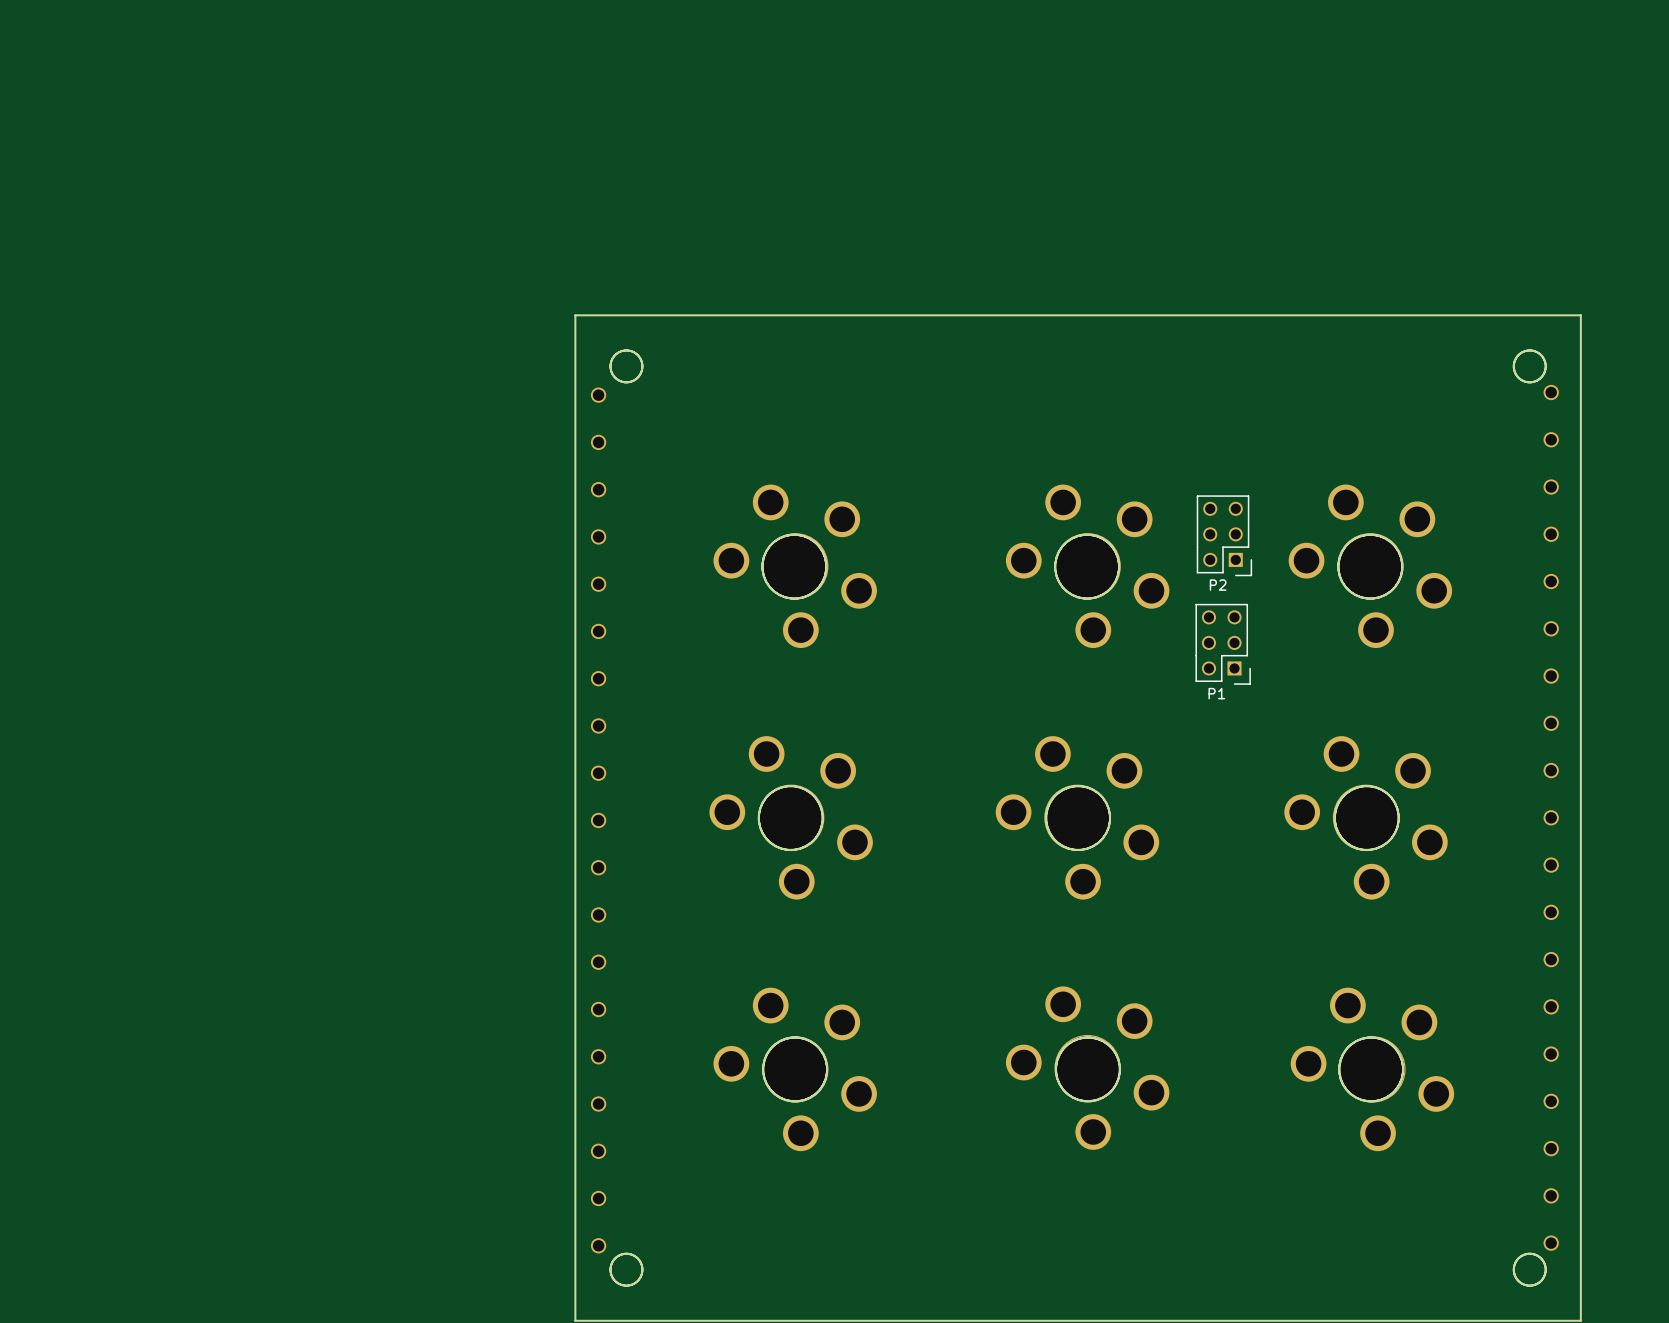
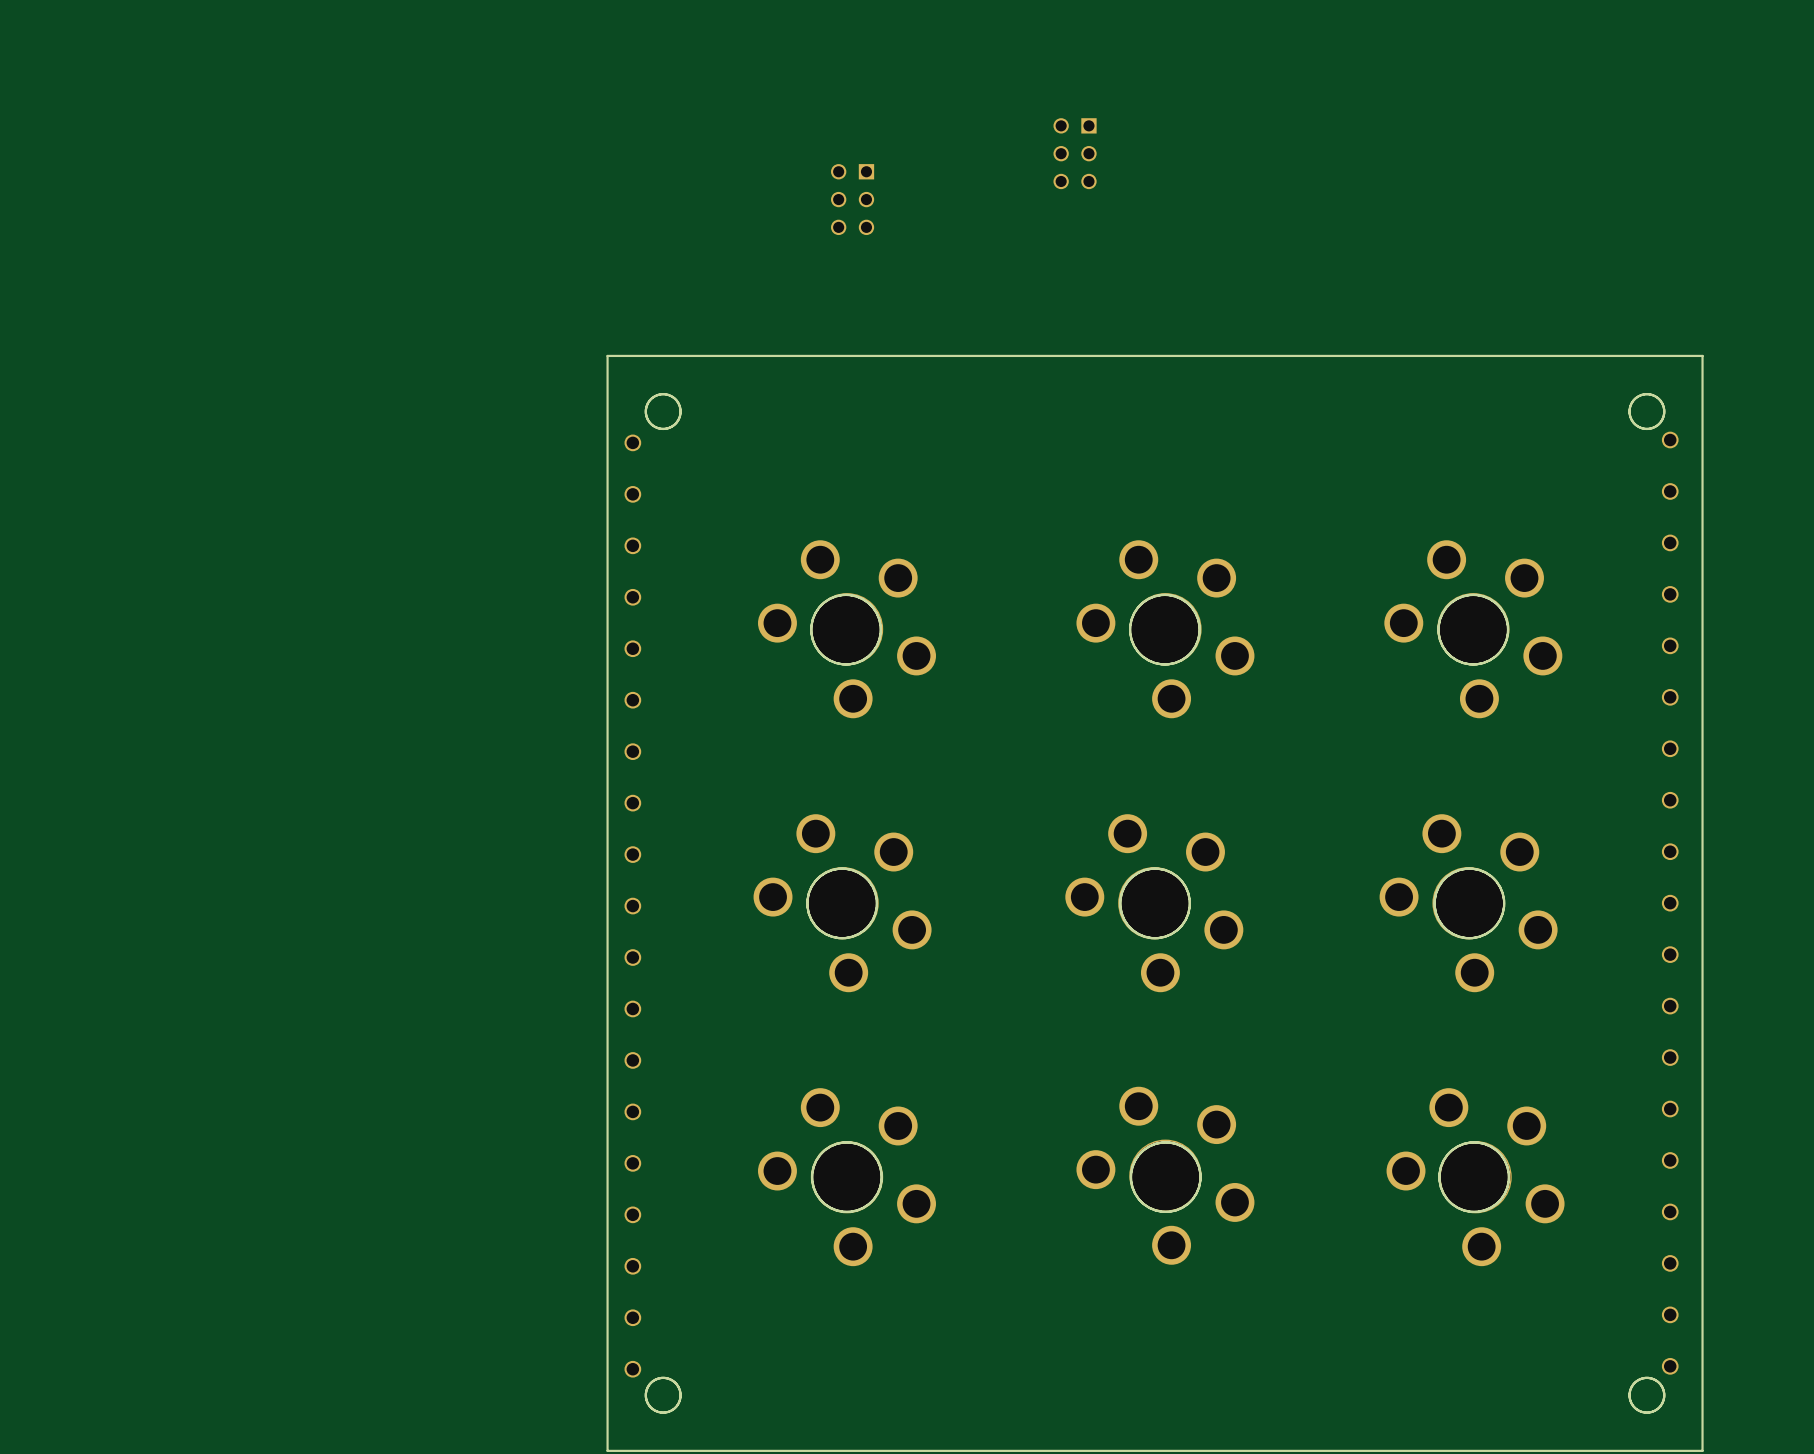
part: none -> (1075, 153)
part: none -> (852, 199)
P2: (1224, 535) -> none
P1: (1223, 644) -> none

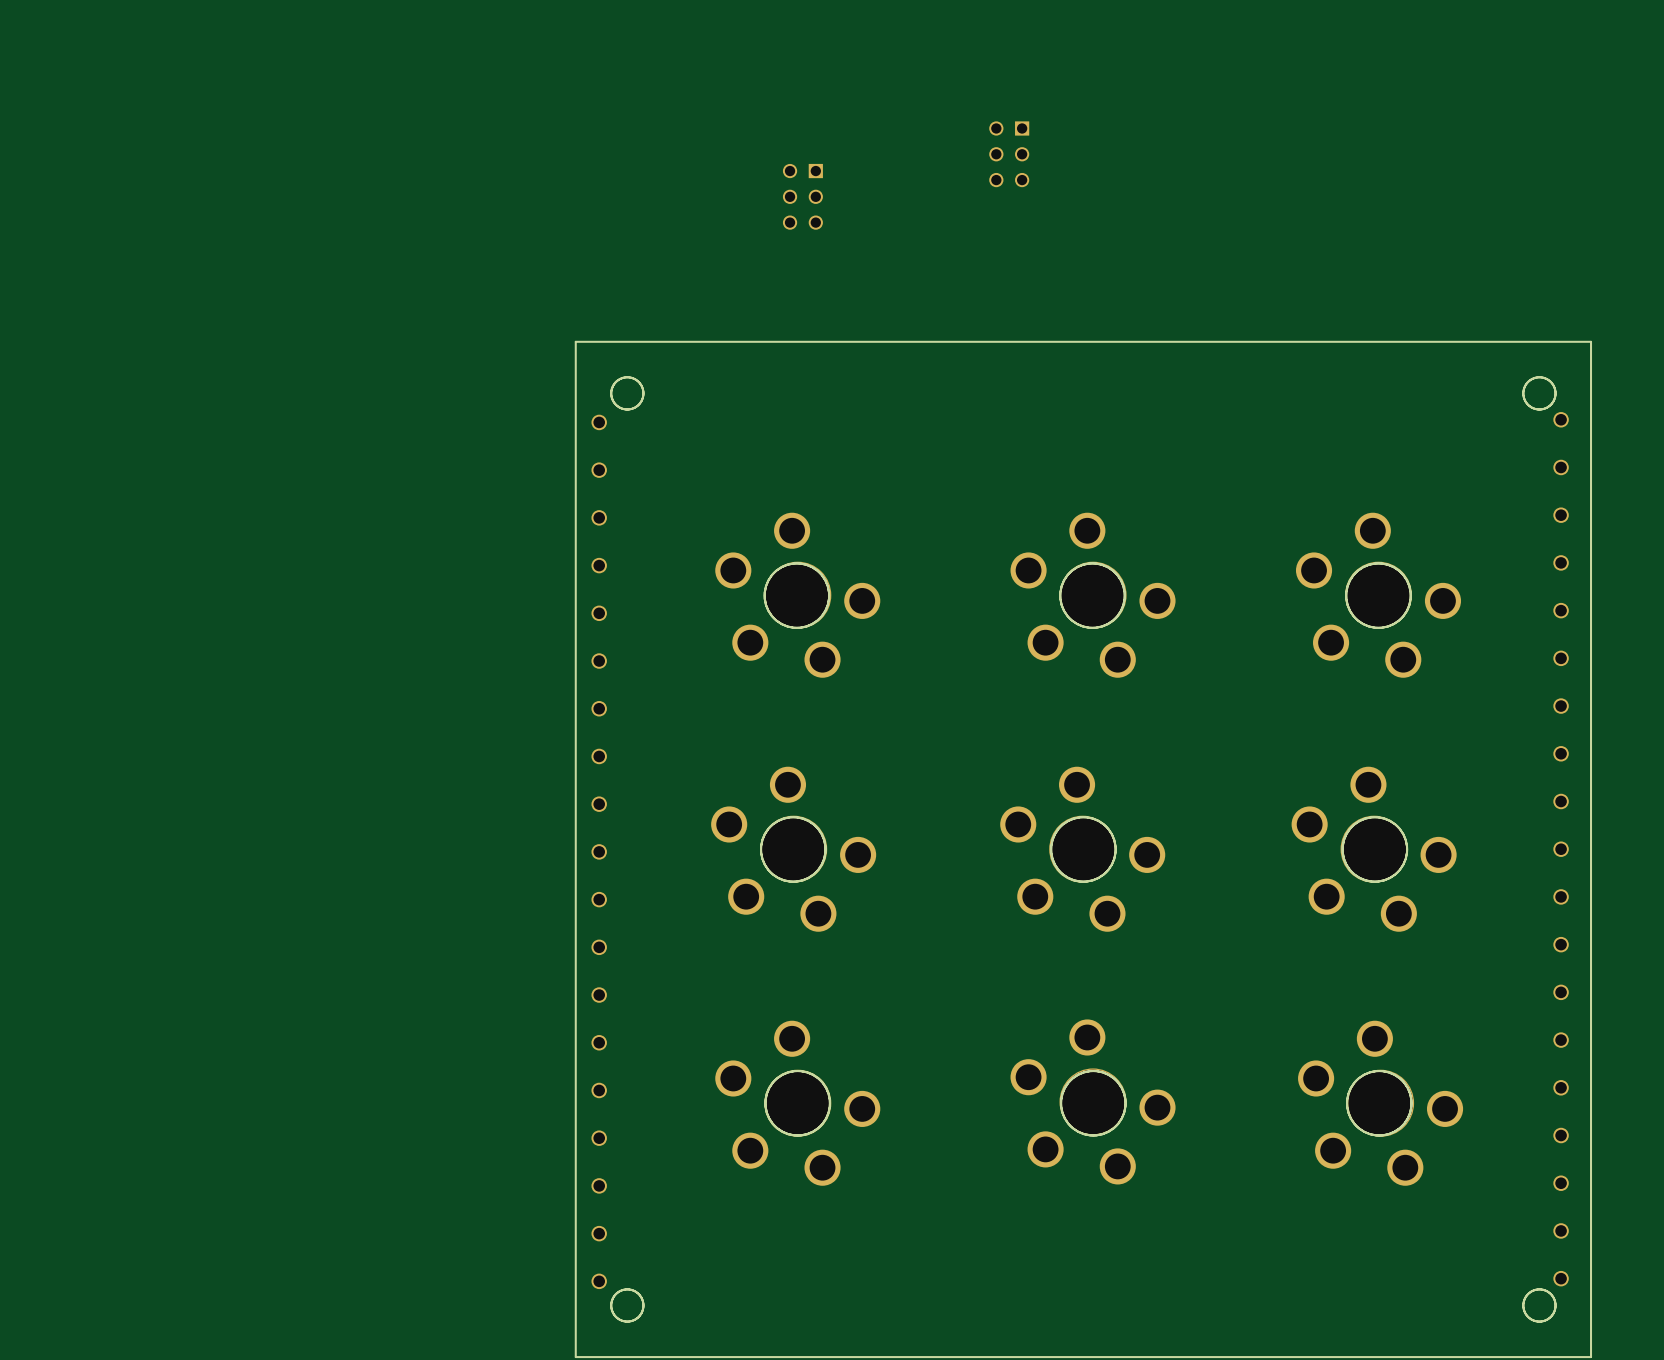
part rotation: 0° (847, 629) -> 180° (797, 595)
part rotation: 0° (1165, 629) -> 180° (1093, 595)
part rotation: 0° (1473, 629) -> 180° (1378, 595)
part rotation: 0° (842, 903) -> 180° (793, 849)
part rotation: 0° (1154, 903) -> 180° (1082, 849)
part rotation: 0° (1468, 903) -> 180° (1374, 849)
part rotation: 0° (1165, 1175) -> 180° (1093, 1101)
part rotation: 0° (847, 1177) -> 180° (797, 1103)
part rotation: 0° (1475, 1177) -> 180° (1380, 1103)

